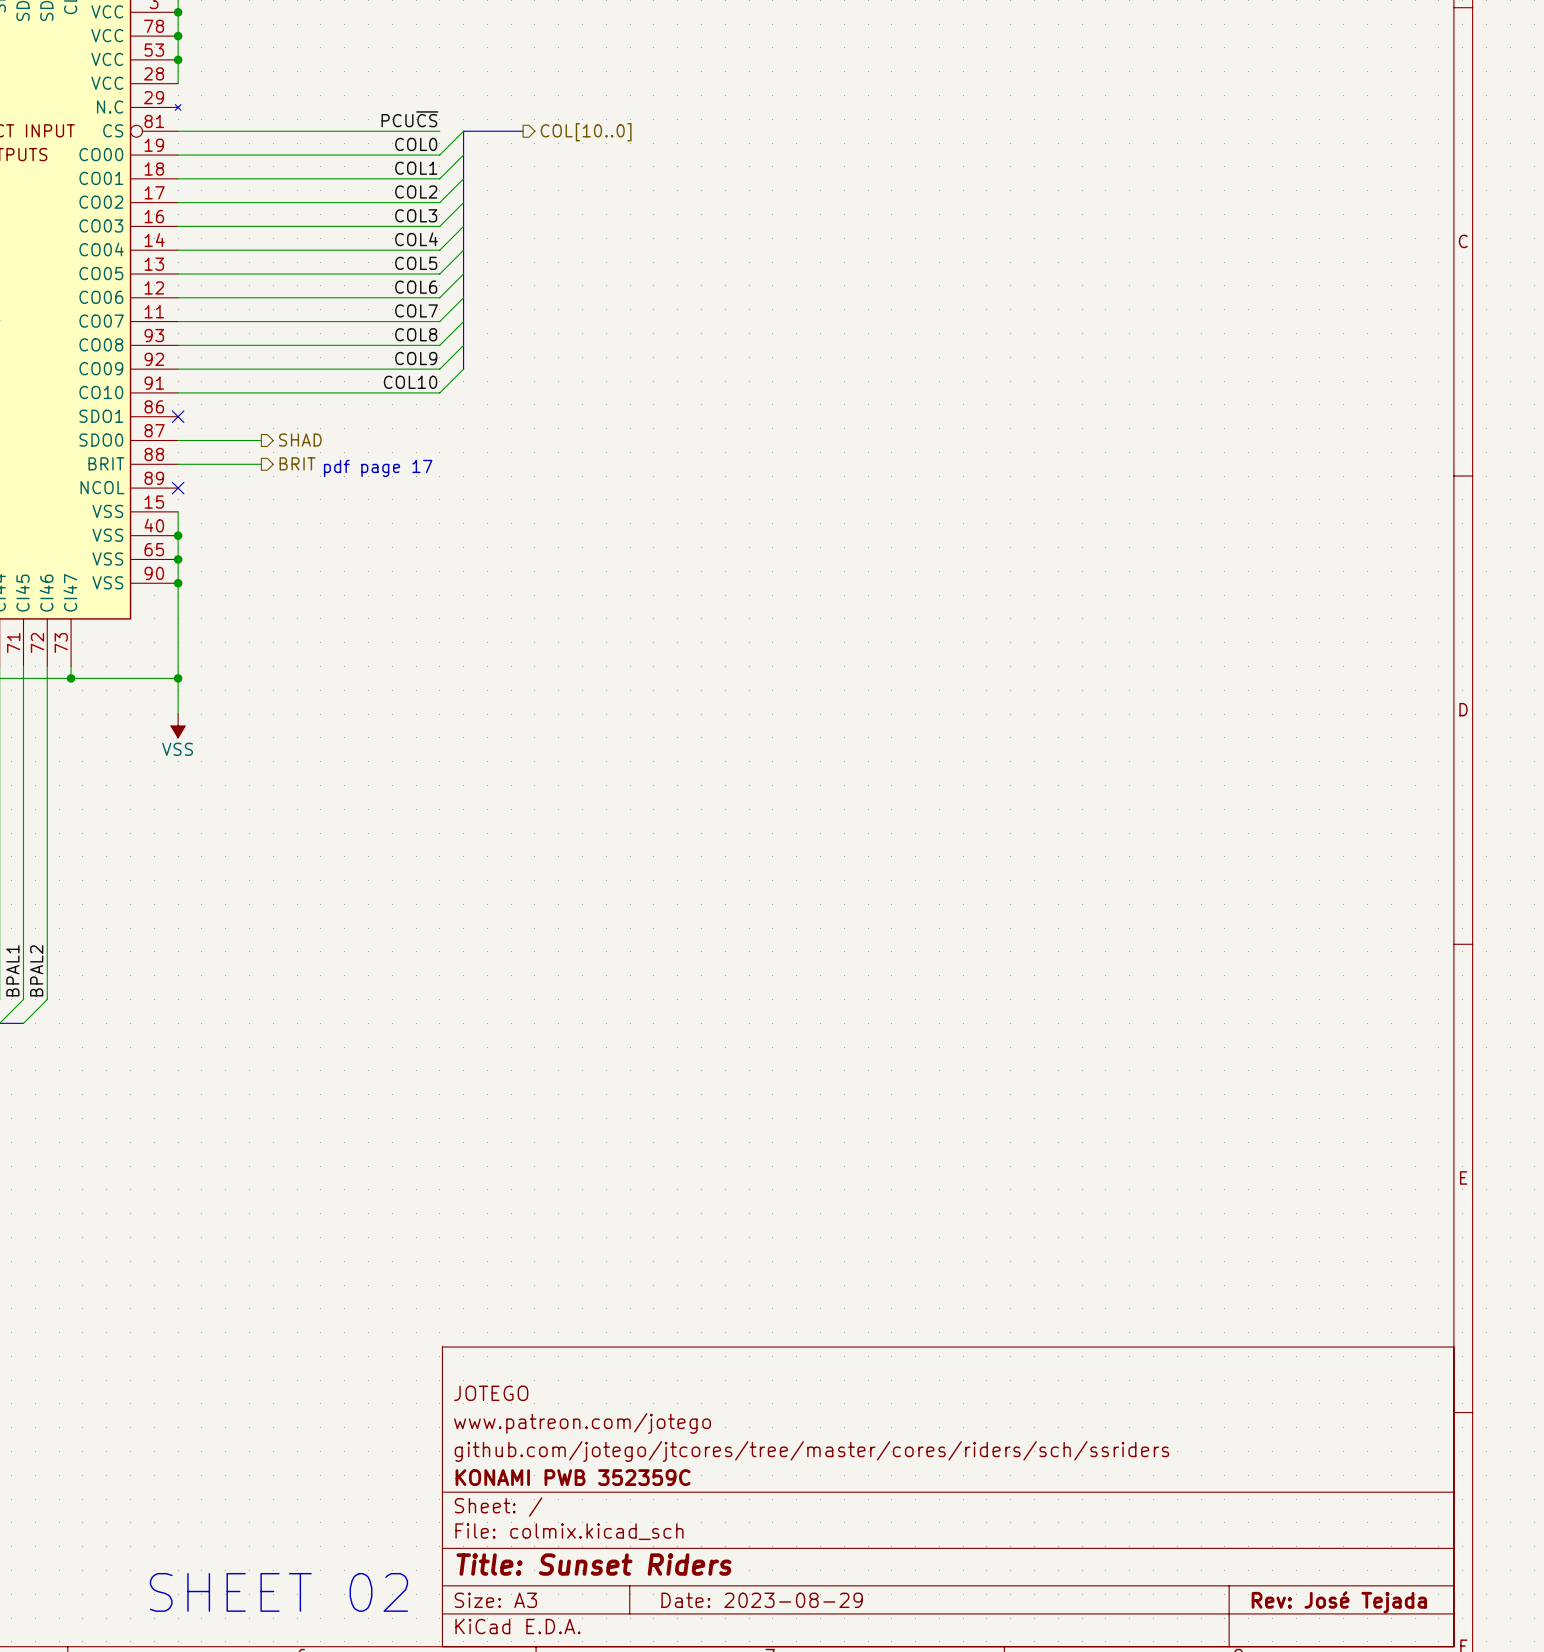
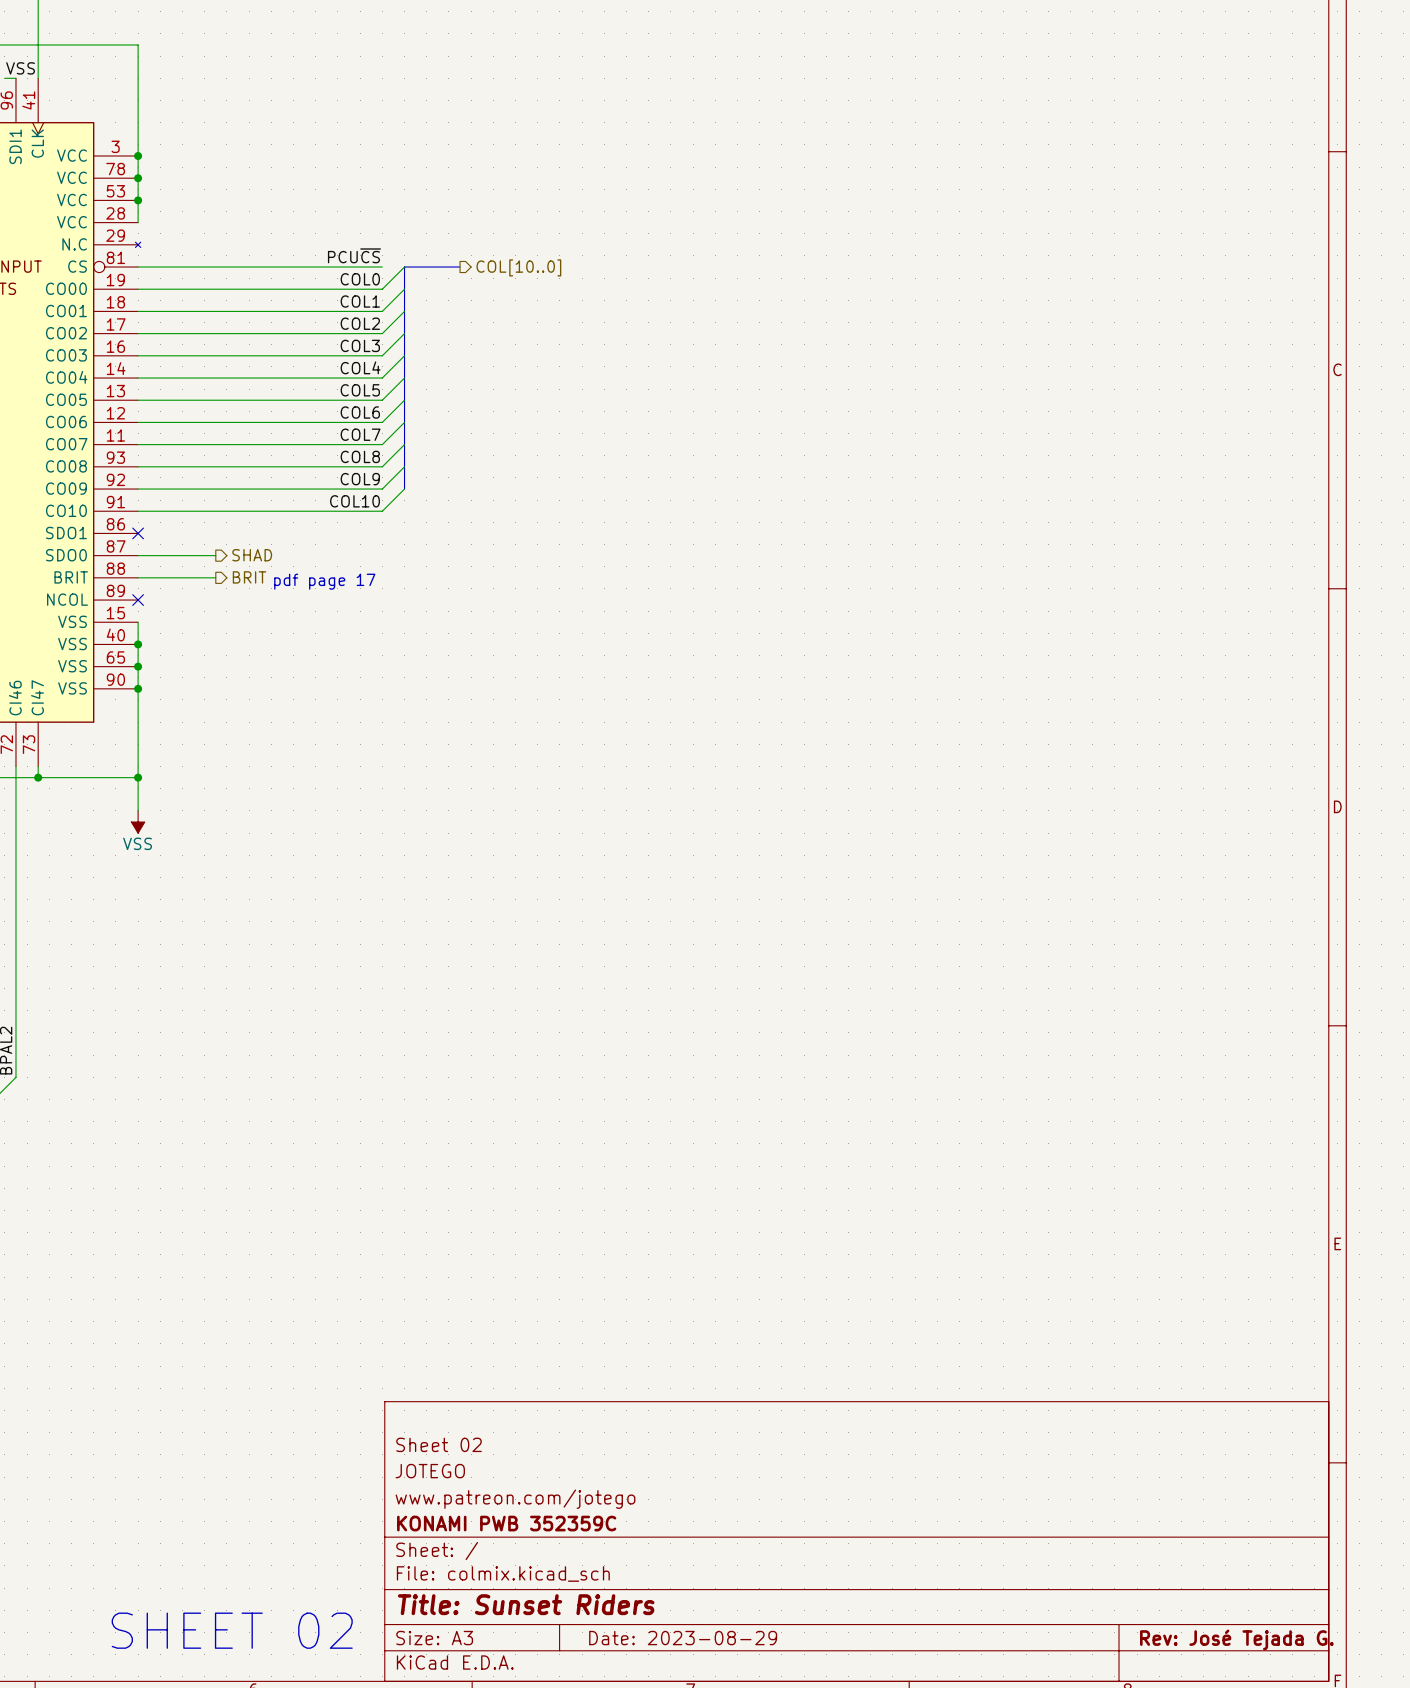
title block: JOTEGO (491, 1393) -> Sheet 02 (439, 1444)
title block: www.patreon.com/jotego (582, 1423) -> JOTEGO (430, 1471)
title block: github.com/jotego/jtcores/tree/master/cores/riders/sch/ssriders (811, 1451) -> www.patreon.com/jotego (515, 1499)
title block: Rev: José Tejada (1339, 1602) -> Rev: José Tejada G. (1236, 1639)

